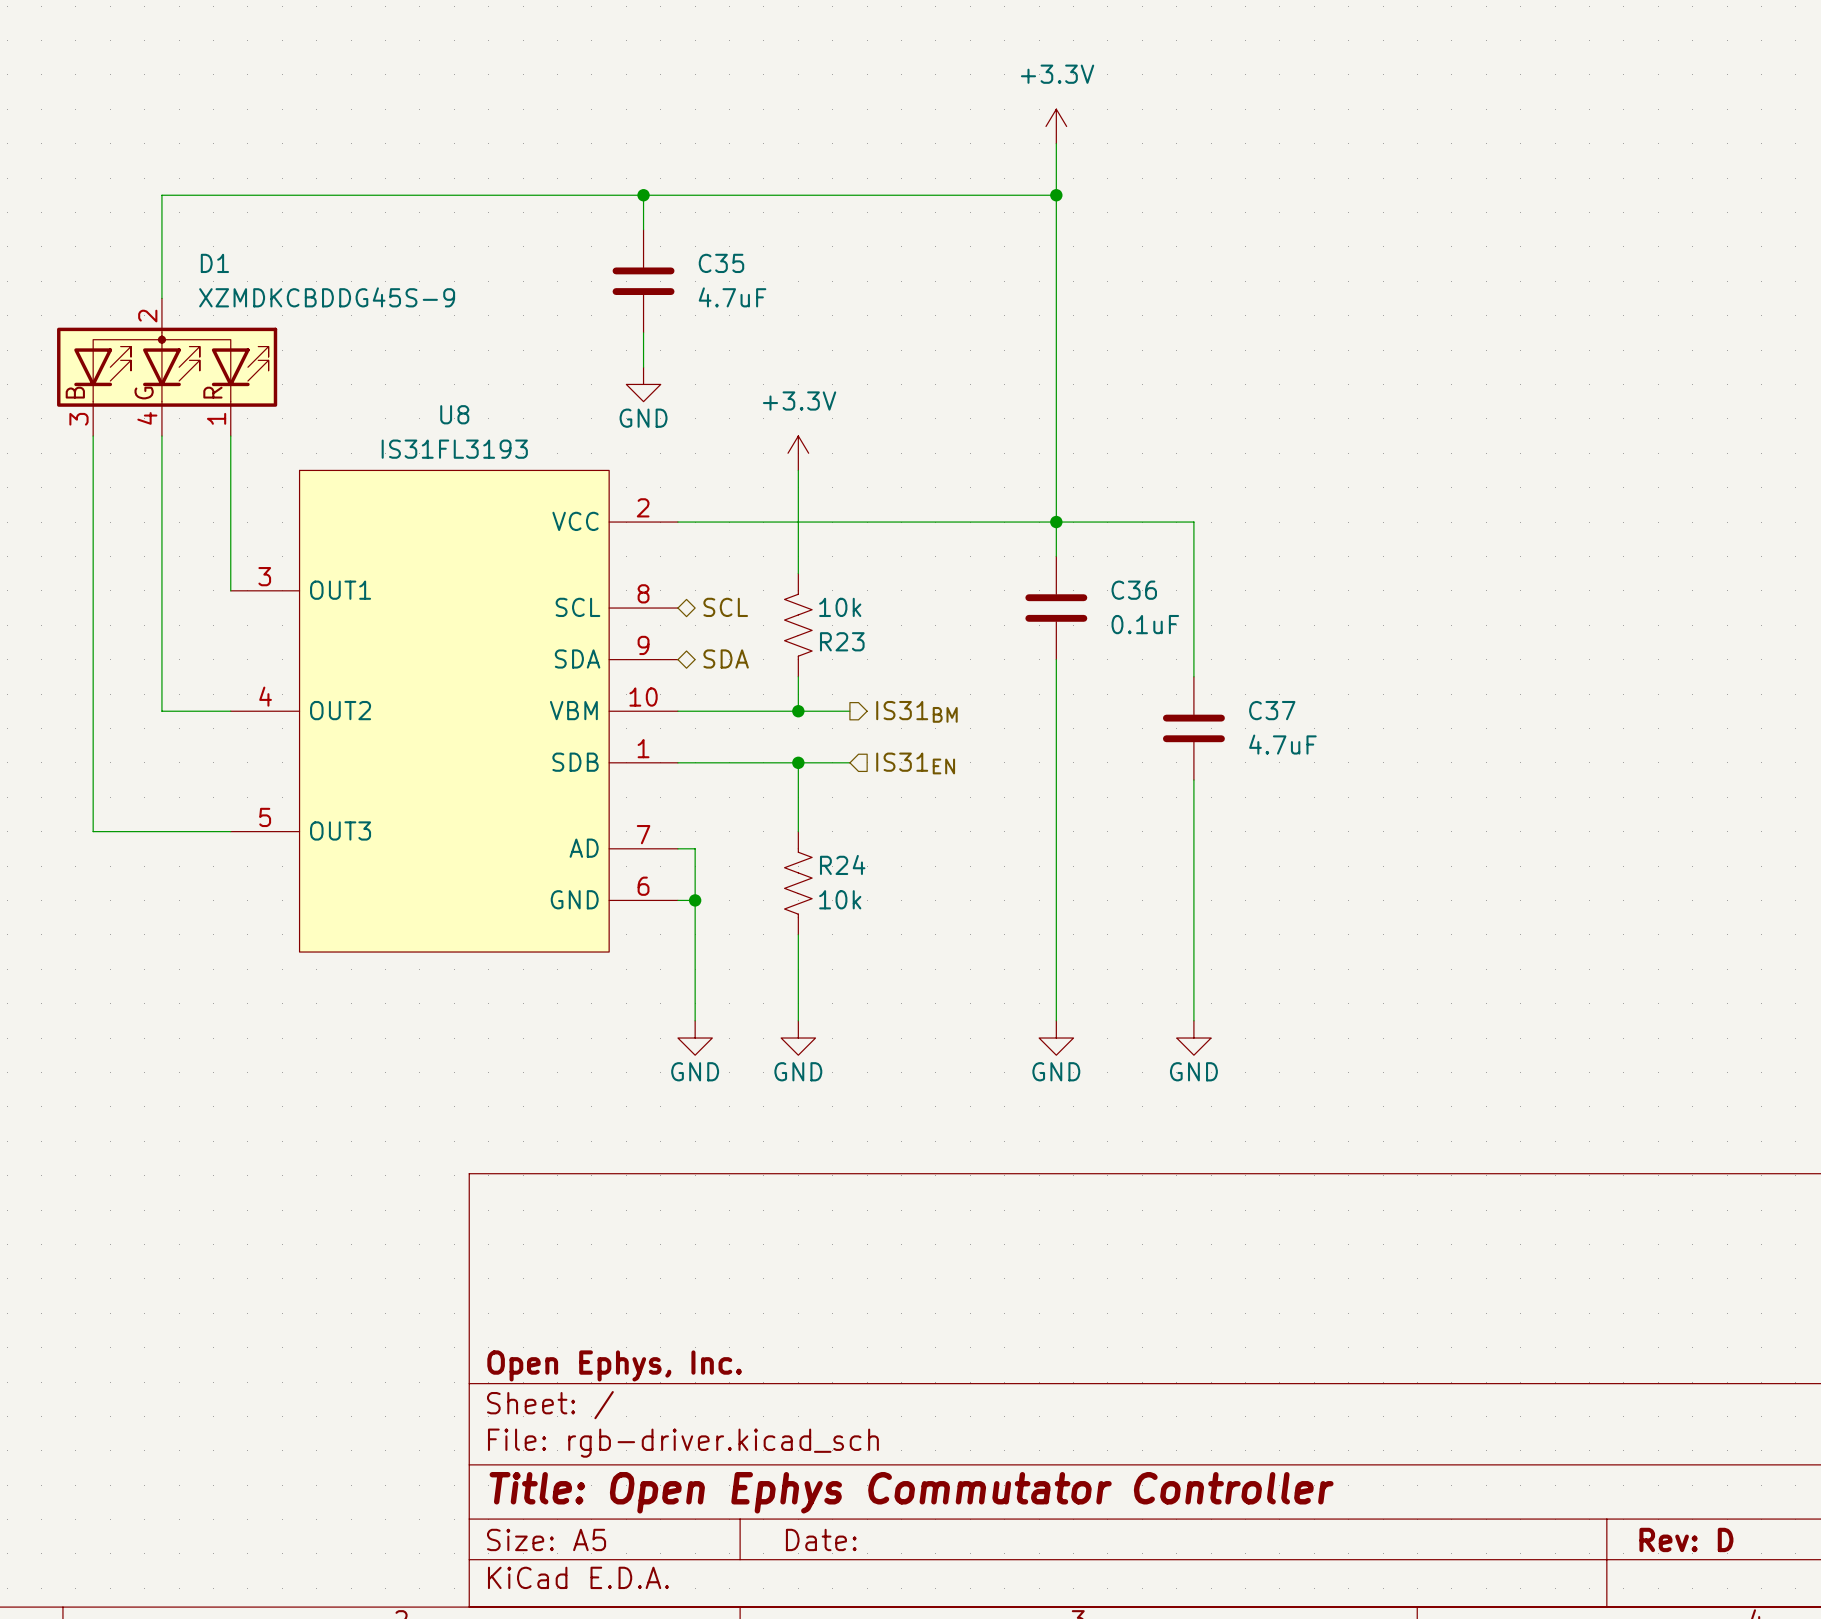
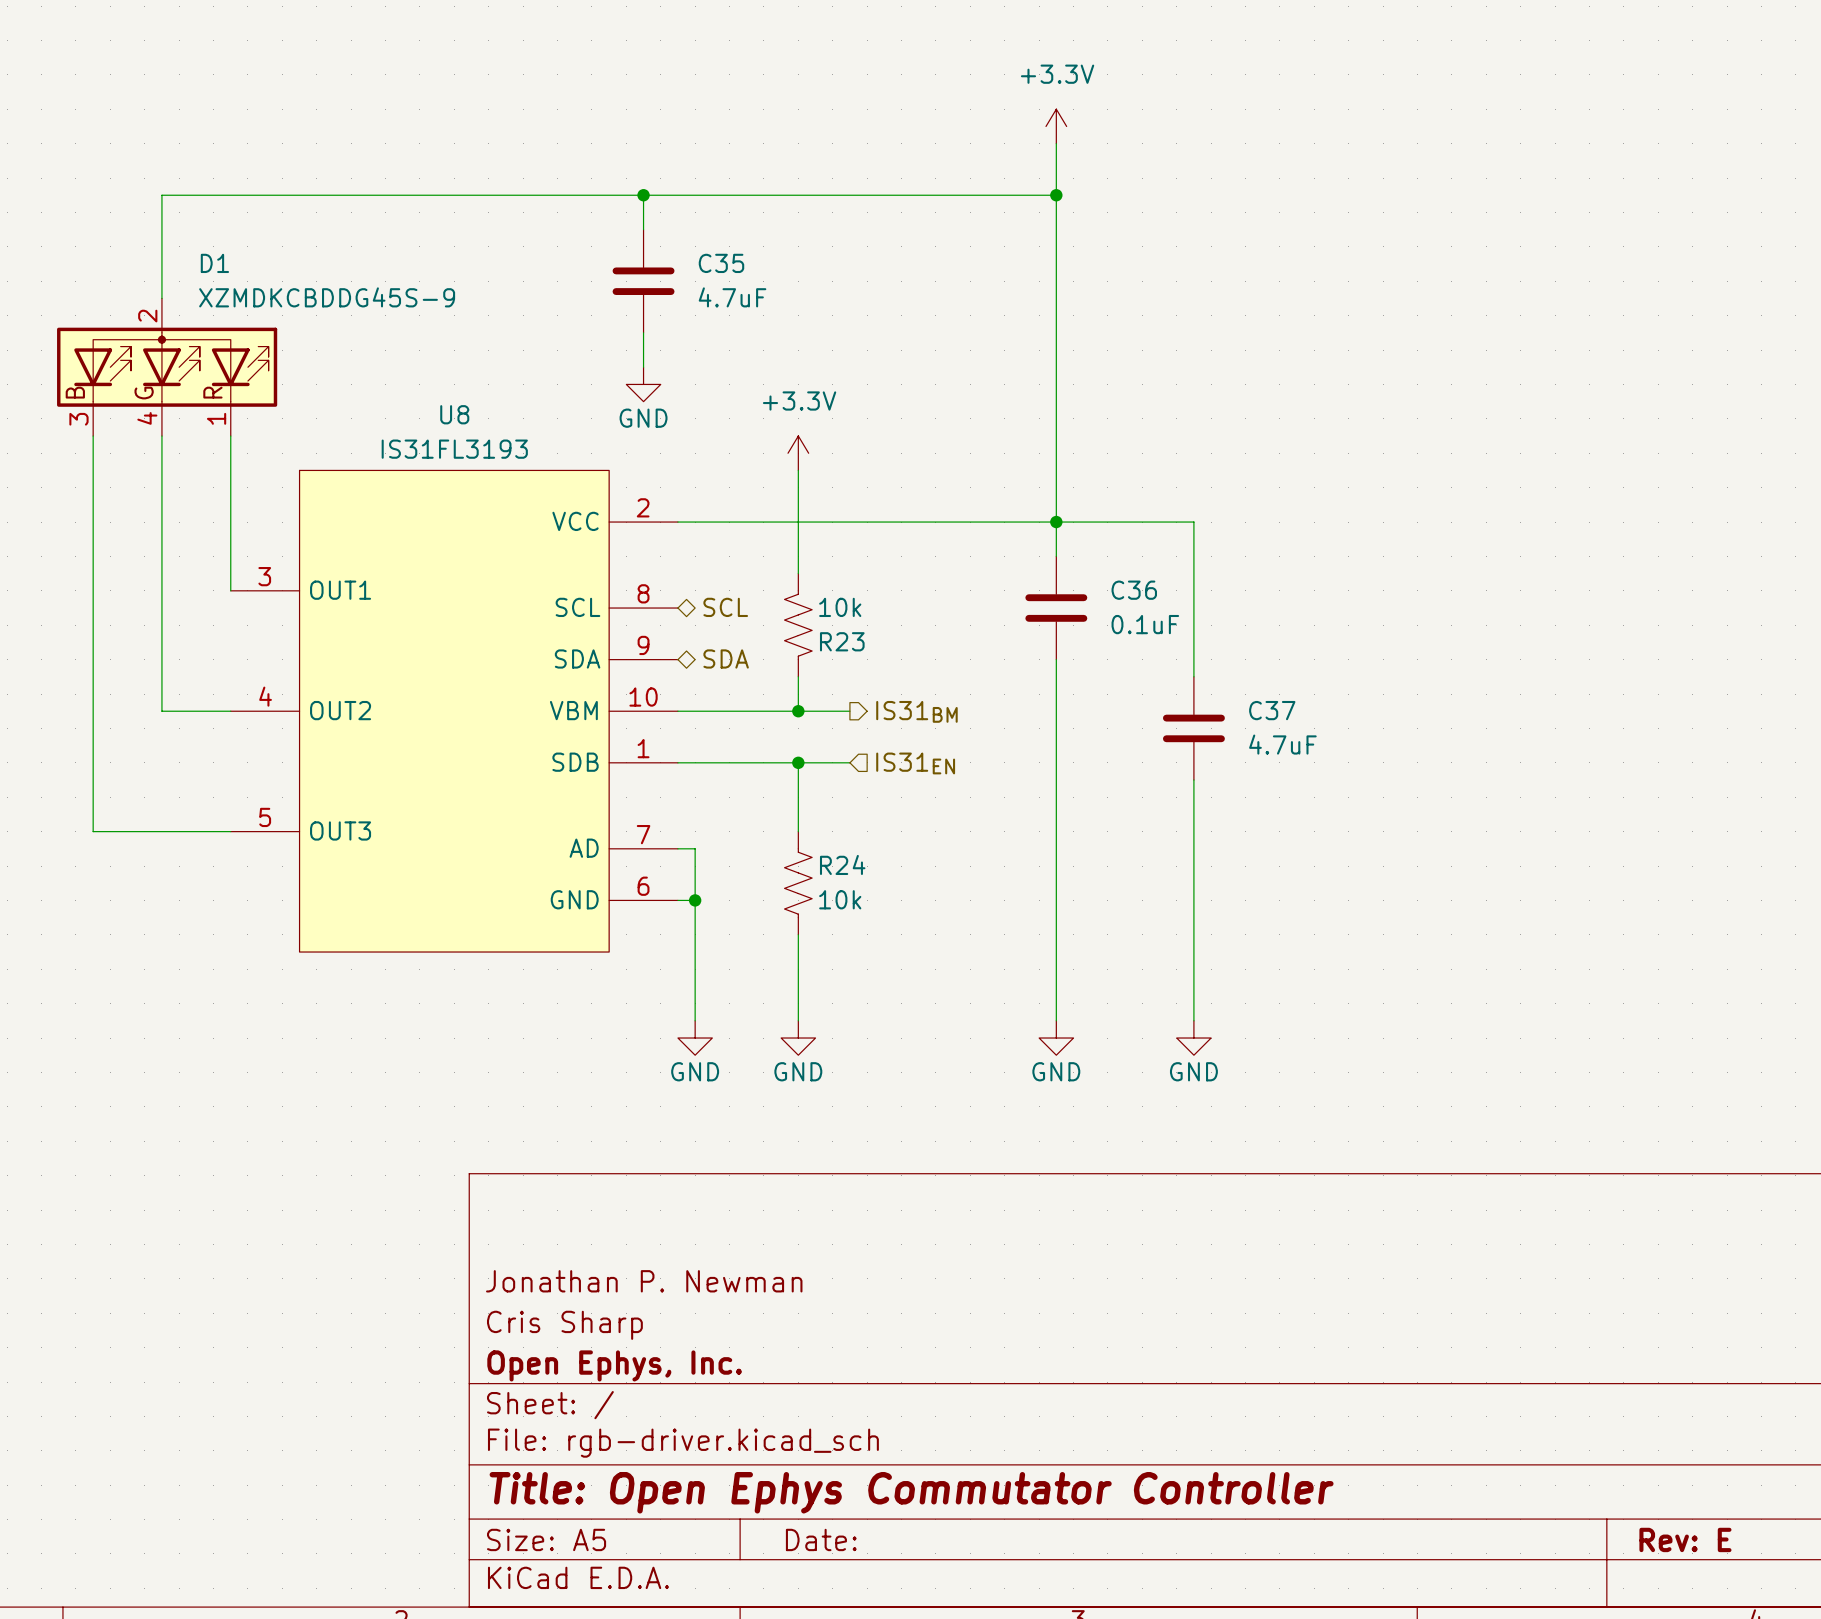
title block: none -> Jonathan P. Newman (644, 1281)
title block: none -> Cris Sharp (564, 1325)
title block: Rev: D (1686, 1539) -> Rev: E (1685, 1539)

